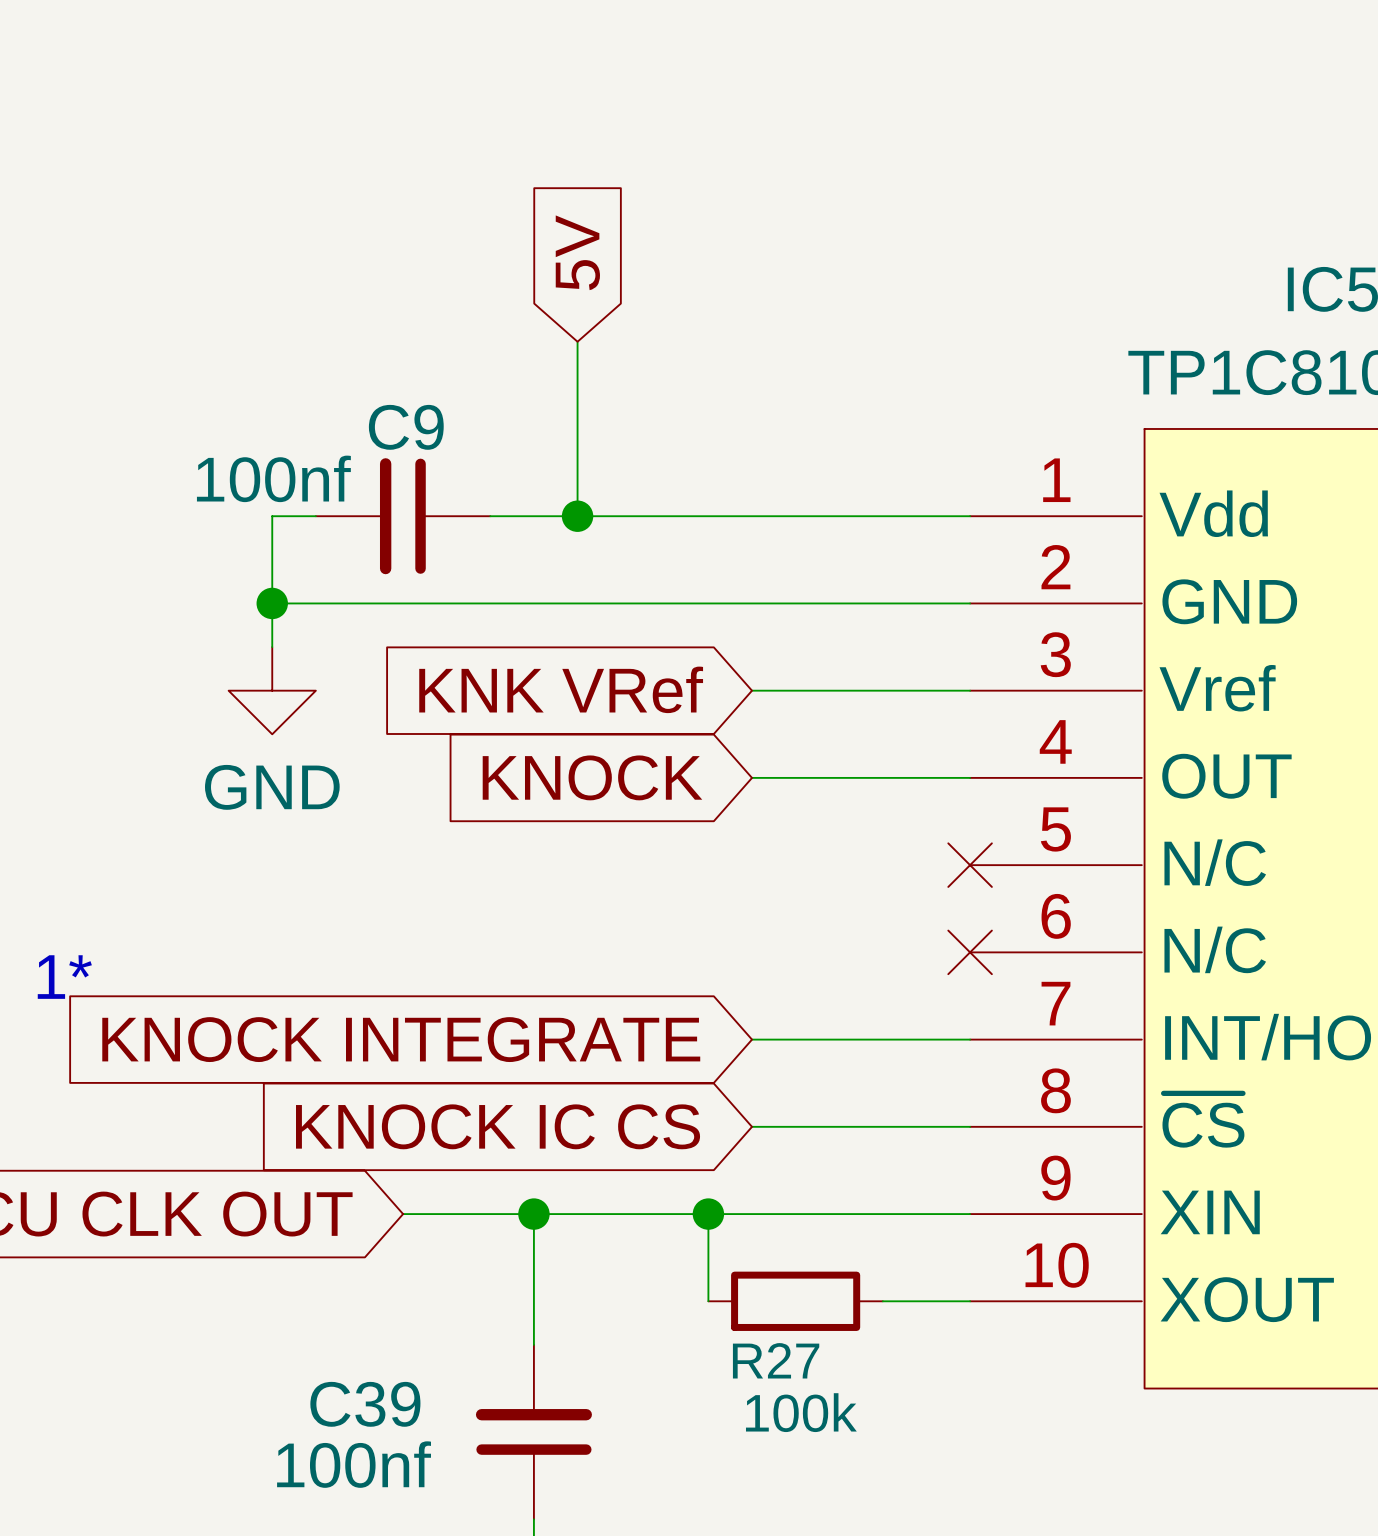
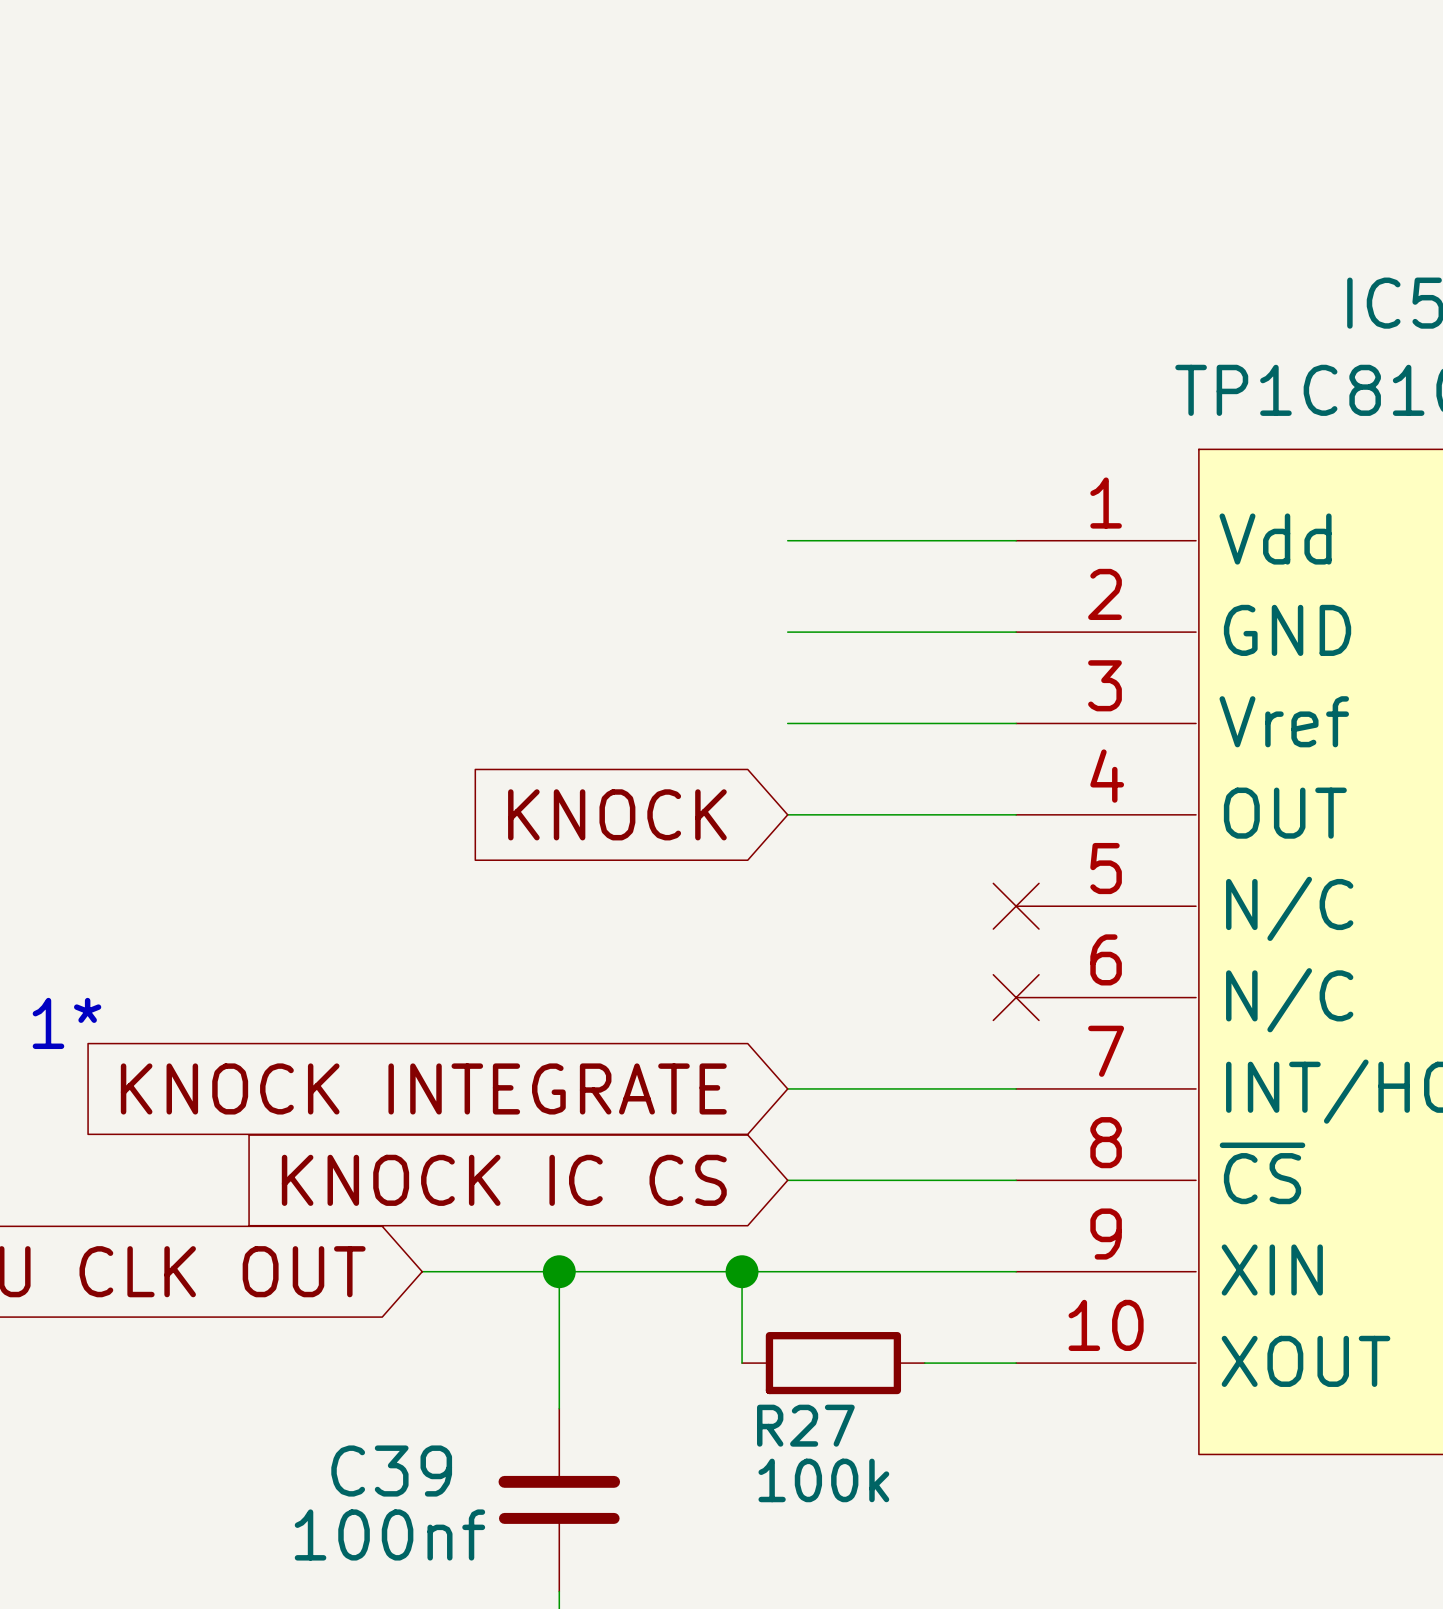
global label: 5V (577, 252) -> none
wire: (577, 341) (577, 516) -> none
wire: (315, 516) (272, 516) (272, 647) -> none
C9: 100nf (403, 516) -> none
wire: (490, 516) (752, 516) -> none
junction: (577, 516) -> none
wire: (272, 603) (752, 603) -> none
junction: (272, 603) -> none
global label: KNK VRef (561, 689) -> none
power symbol: GND (272, 690) -> none

